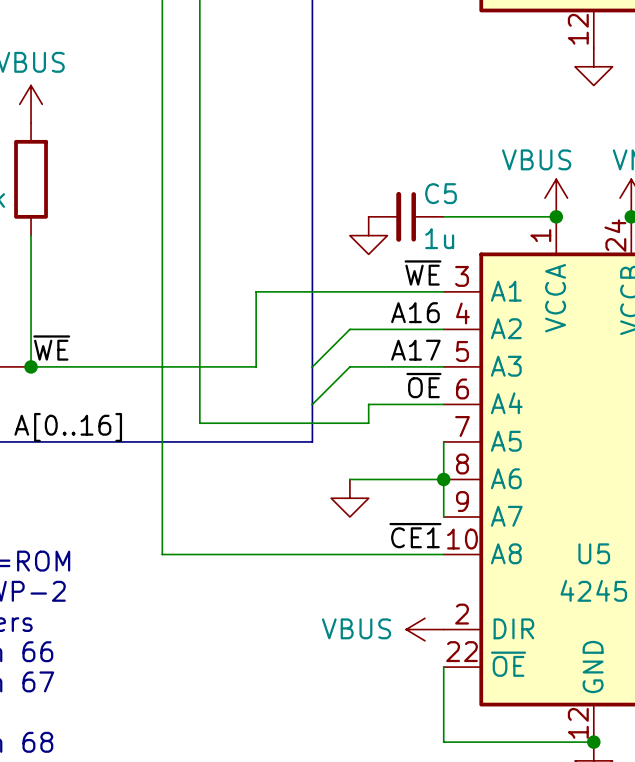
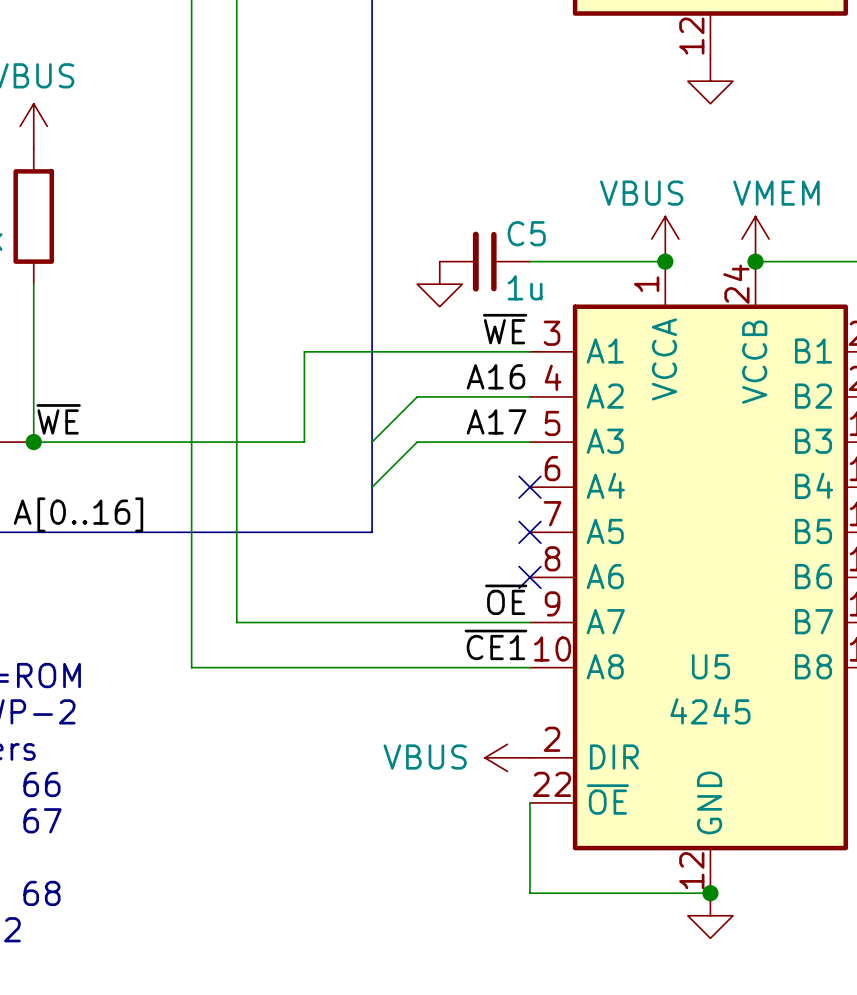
label position: ~{OE} (423, 385) -> ~{OE} (506, 599)
wire: (443, 404) (368, 404) (368, 423) (199, 423) -> (529, 622) (236, 622) (236, 509)
no-connect mark: none -> (529, 487)
wire: (443, 441) (443, 517) -> none
no-connect mark: none -> (529, 532)
wire: (349, 479) (443, 479) -> none
junction: (443, 479) -> none
no-connect mark: none -> (529, 577)
power symbol: (349, 498) -> none

